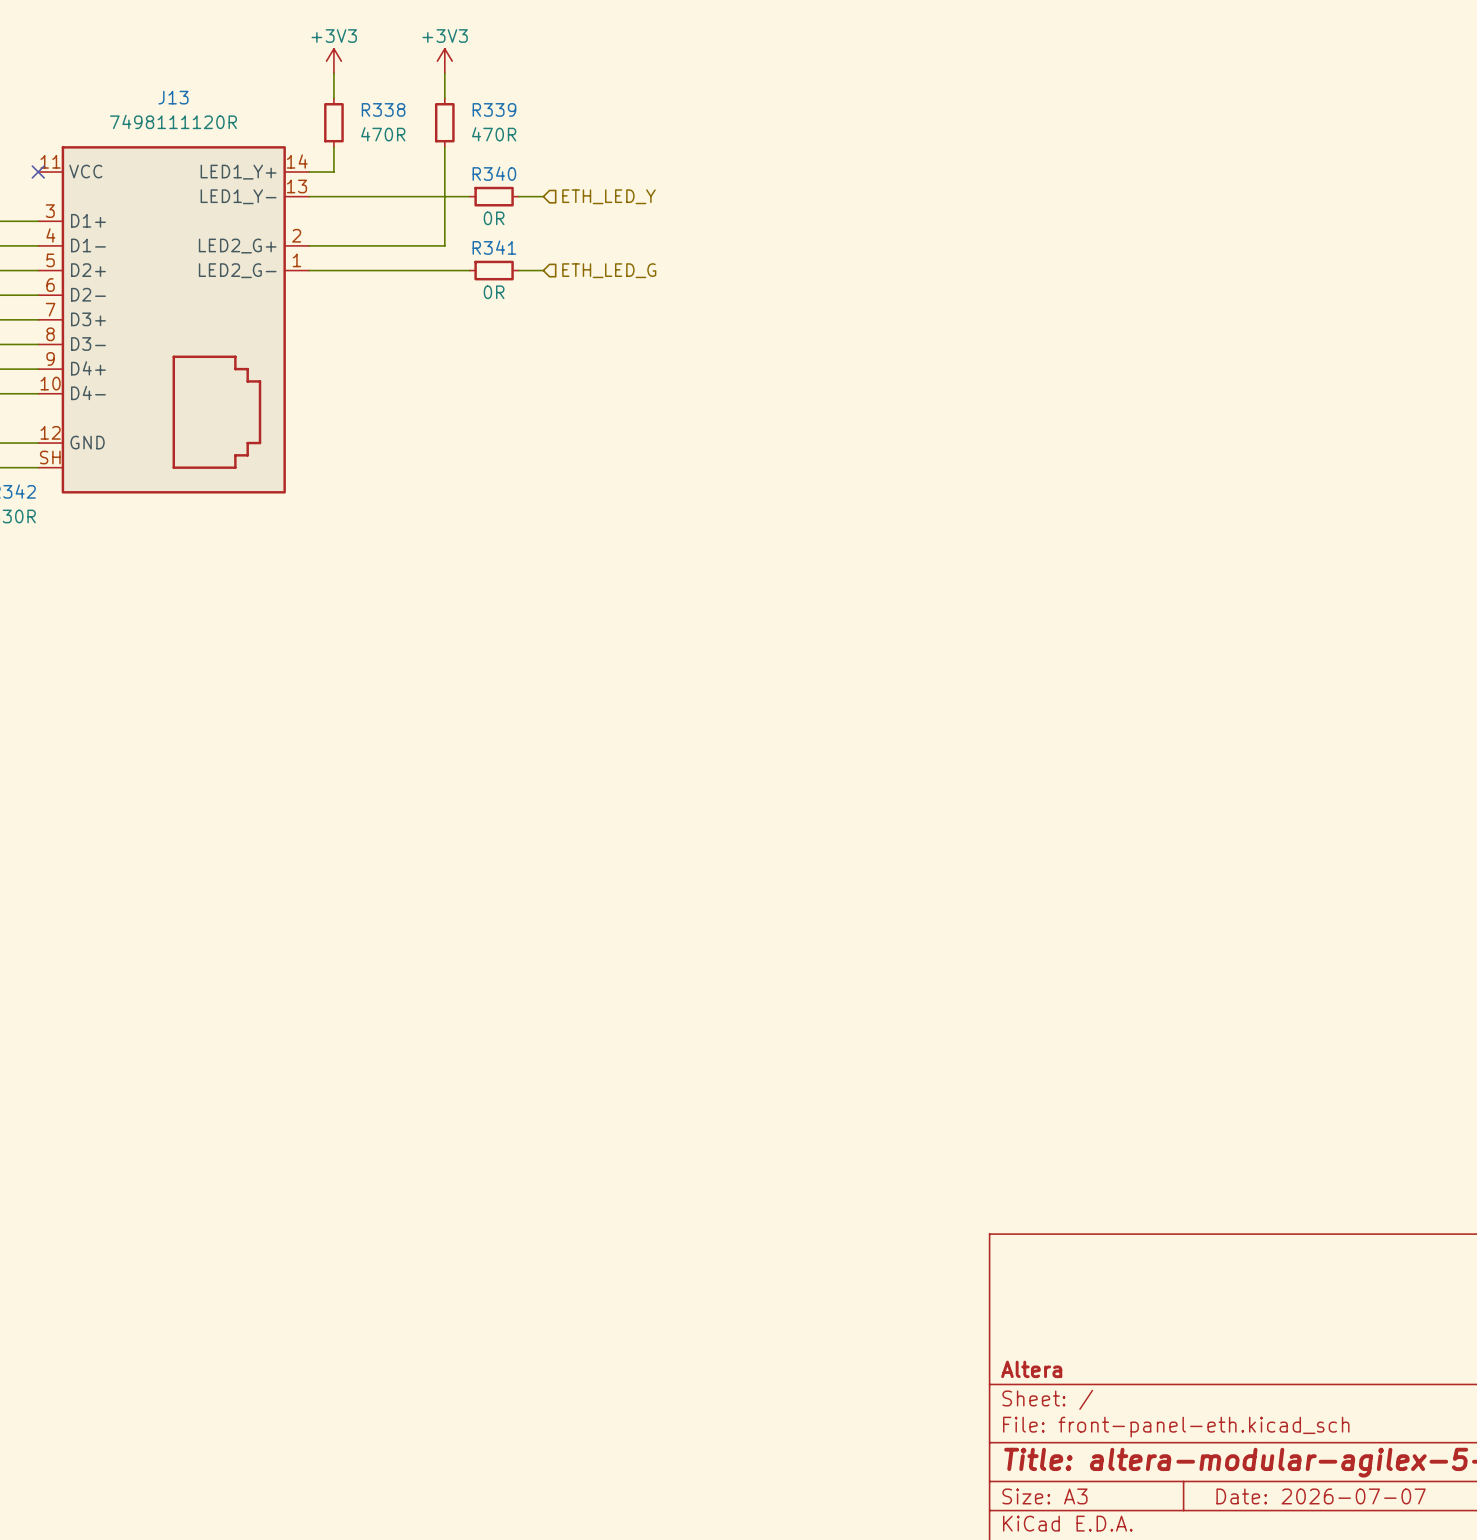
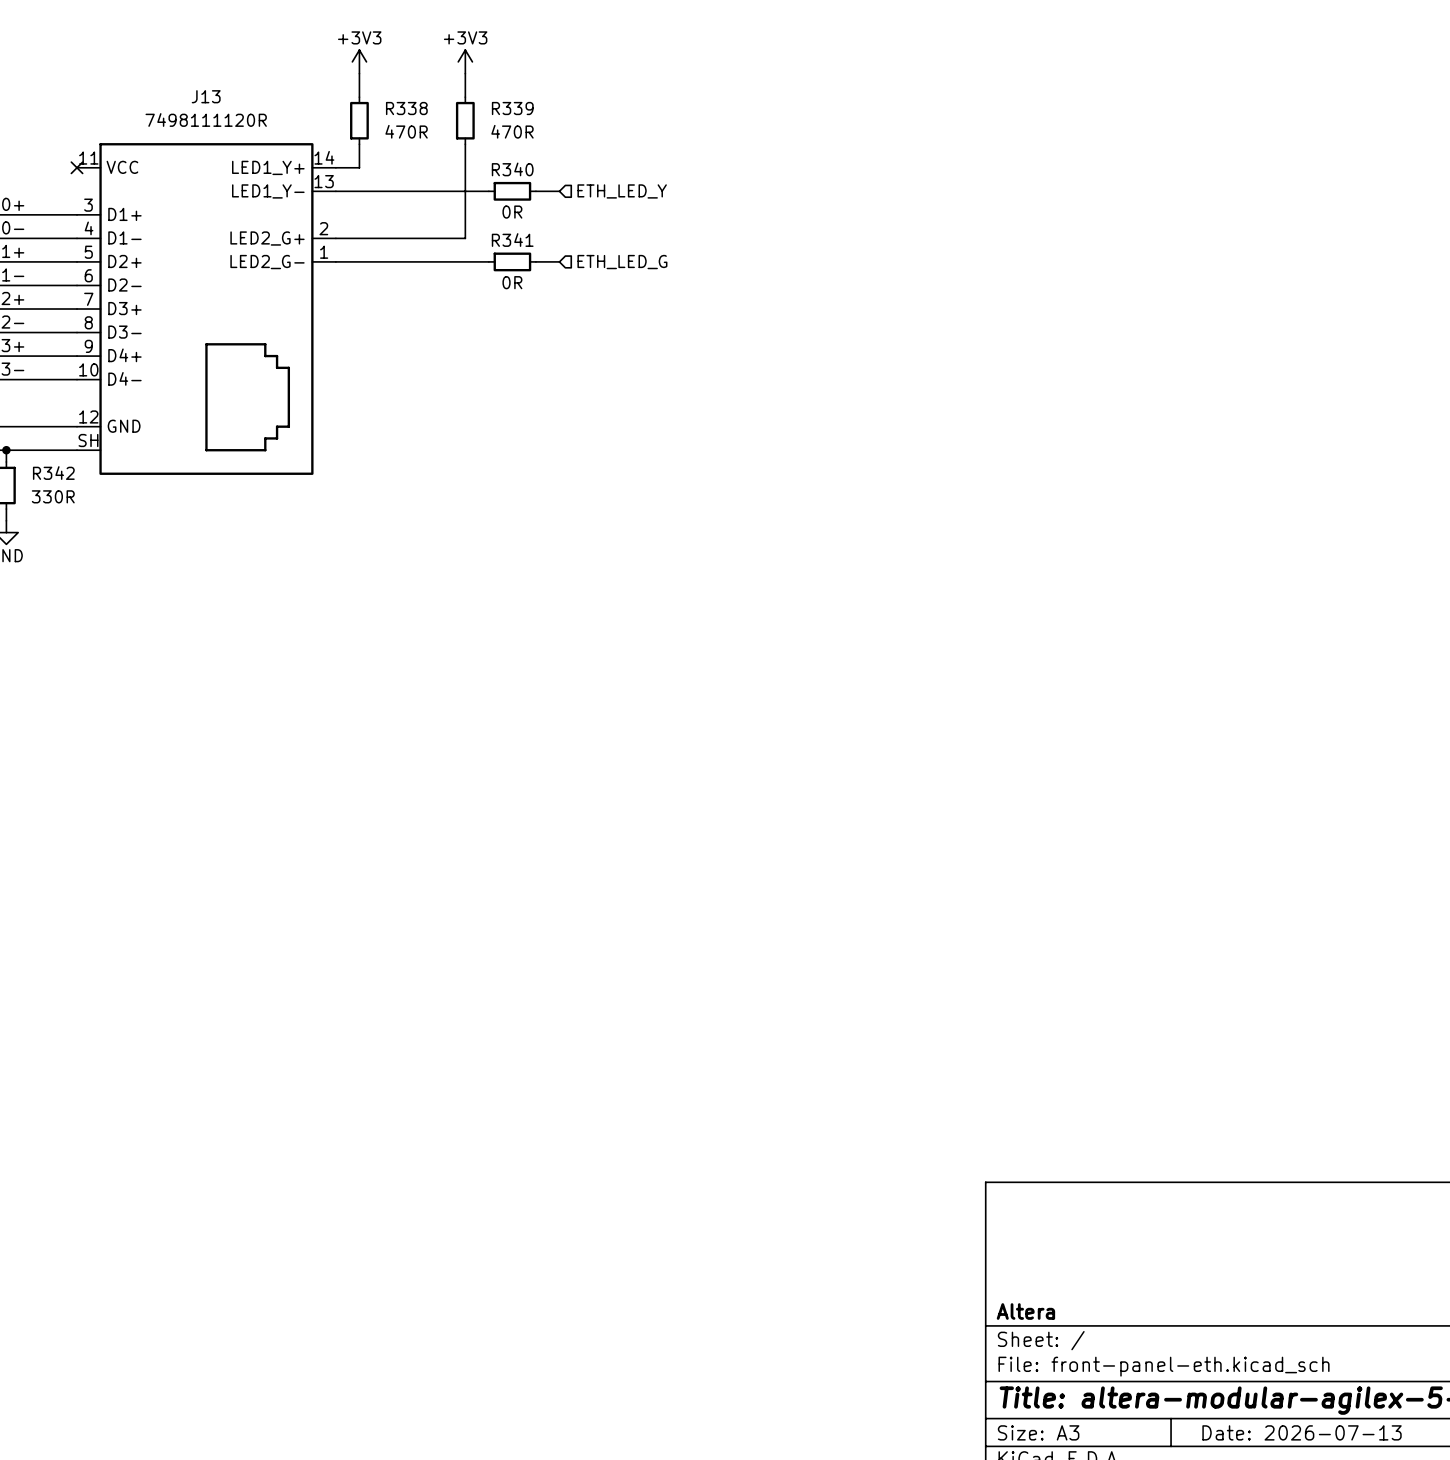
title block: Date: 2026-07-07 (1321, 1496) -> Date: 2026-07-13 (1302, 1432)

